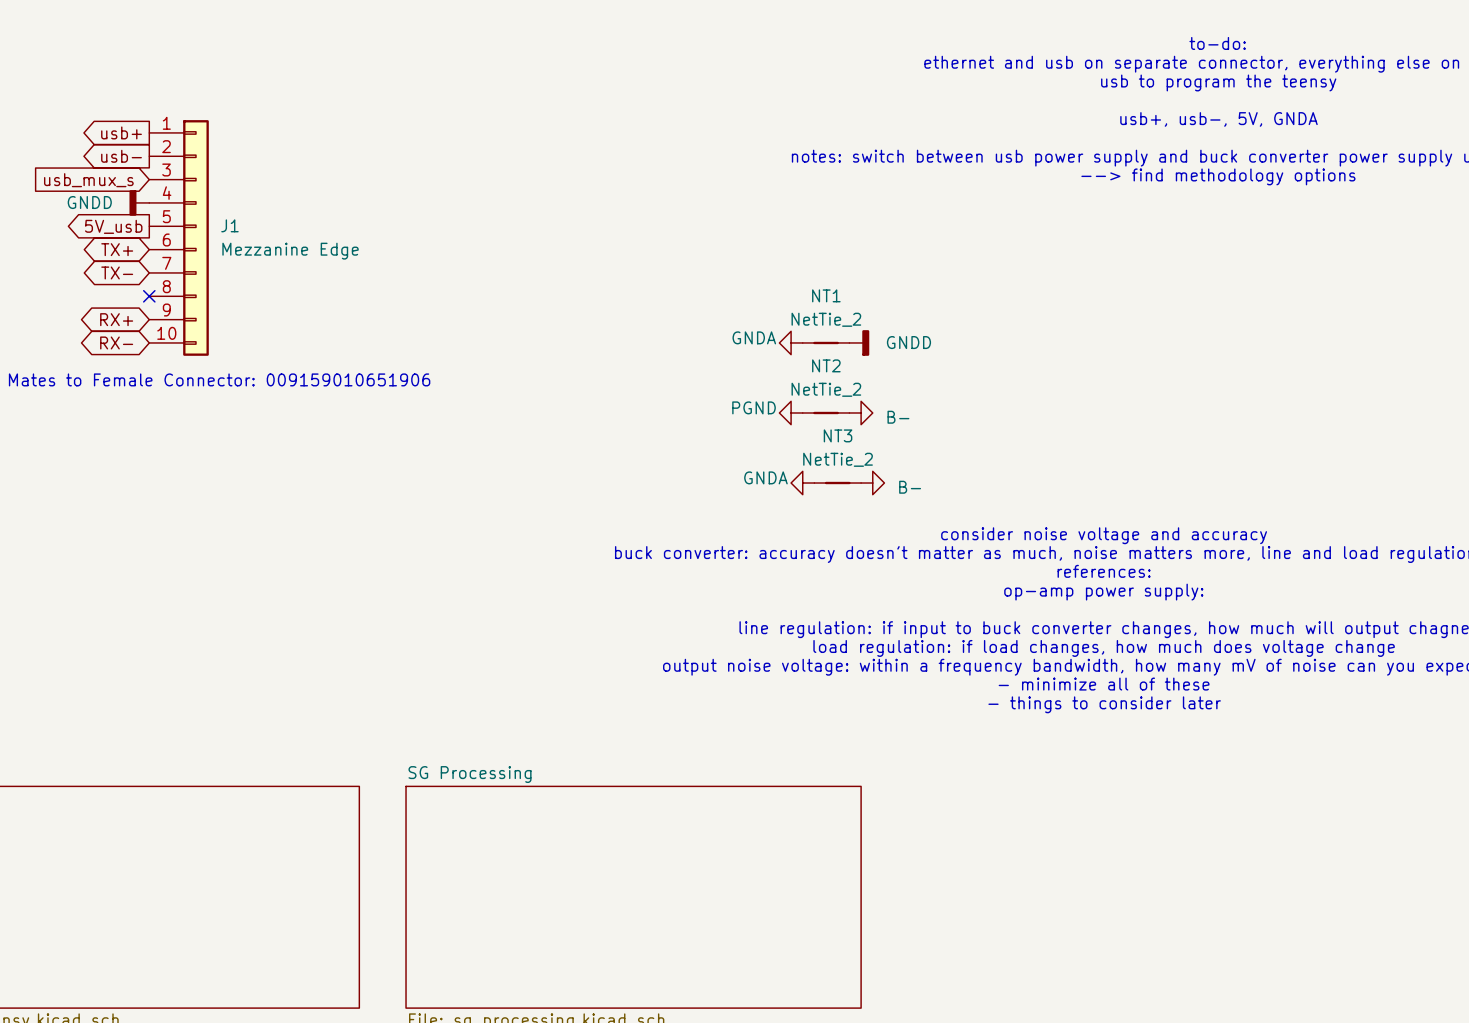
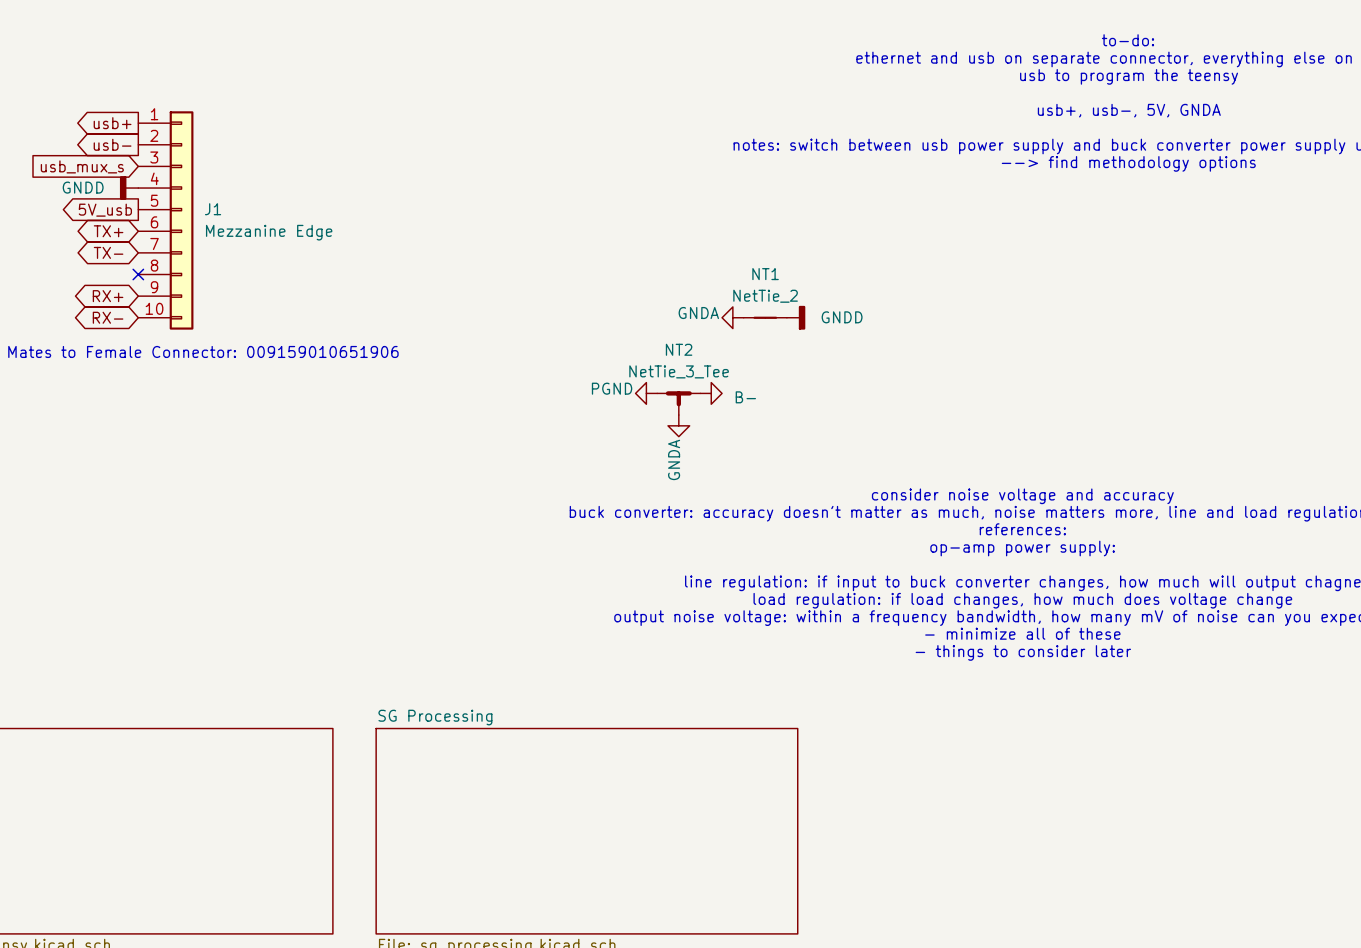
NT2 value: NetTie_2 (826, 389) -> NetTie_3_Tee (679, 371)
NT2 symbol: [802, 411, 850, 415] -> [657, 391, 701, 417]
power symbol position: PGND (791, 412) -> PGND (646, 393)
power symbol: B- (861, 412) -> none
power symbol: none -> B- (711, 393)
power symbol rotation: 0° (802, 483) -> 90° counterclockwise (678, 425)
power symbol position: GNDA (802, 483) -> GNDA (678, 425)
NT3: NetTie_2 (837, 483) -> none
power symbol: B- (872, 483) -> none

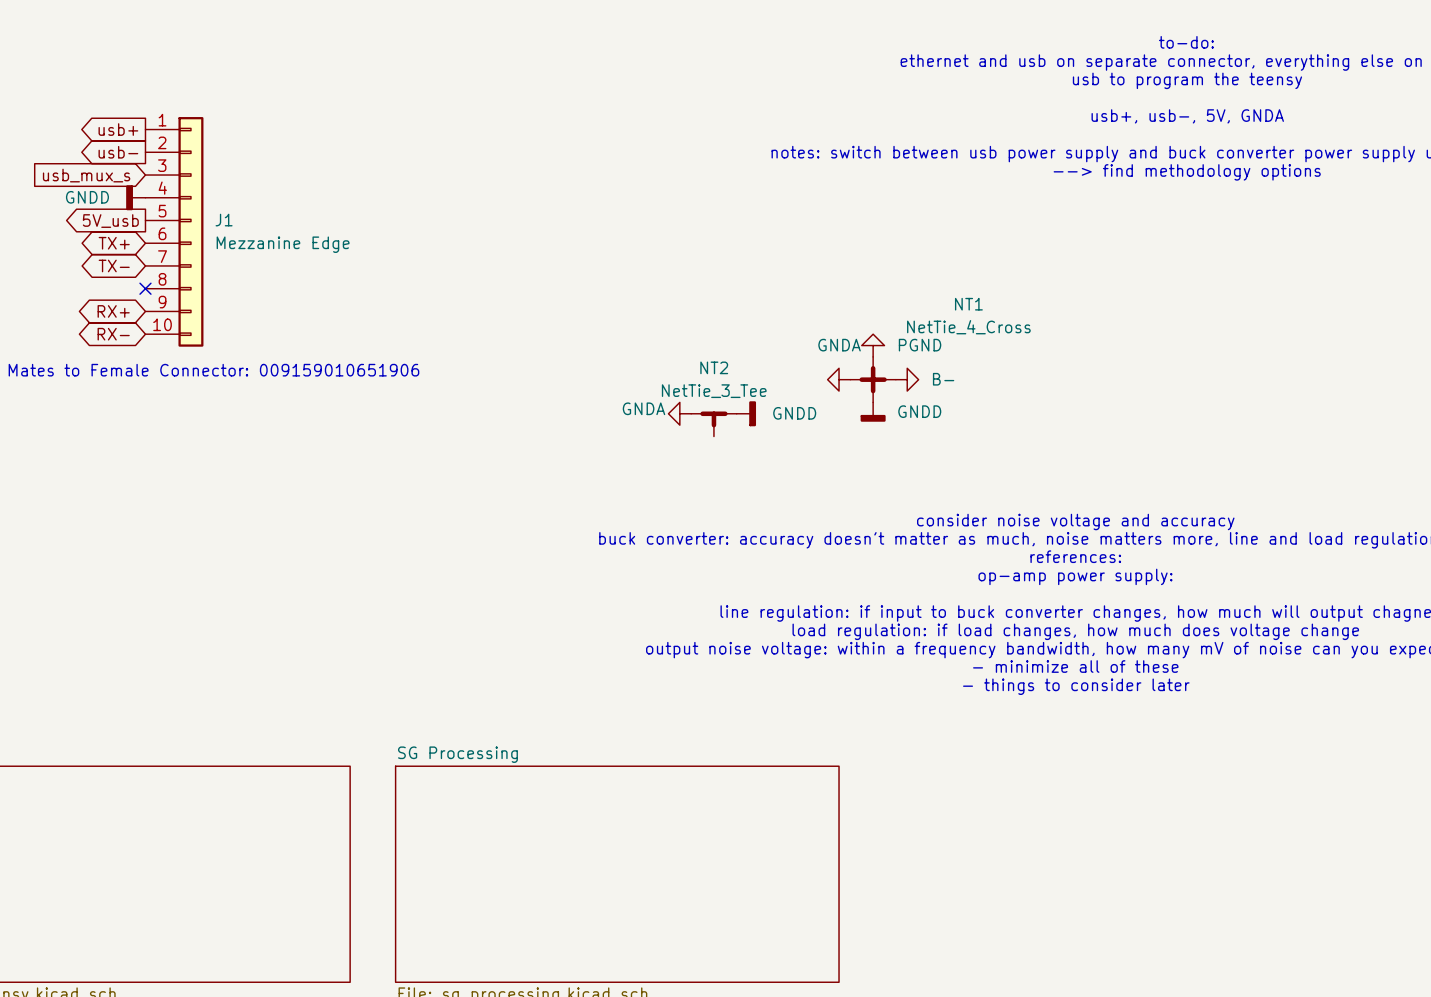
NT1 name position: NT1 (765, 274) -> NT1 (968, 304)
NT1 value: NetTie_2 (765, 296) -> NetTie_4_Cross (968, 327)
NT1 symbol: [743, 316, 787, 319] -> [850, 356, 896, 403]
power symbol: GNDA (732, 317) -> none
power symbol rotation: 0° (796, 317) -> 90° clockwise (873, 412)
power symbol position: GNDD (796, 317) -> GNDD (873, 412)
power symbol: none -> PGND (873, 345)
power symbol: none -> GNDA (839, 379)
power symbol: none -> B- (907, 379)
power symbol: PGND (646, 393) -> GNDA (679, 413)
power symbol: B- (711, 393) -> GNDD (746, 413)
power symbol: GNDA (678, 425) -> none

